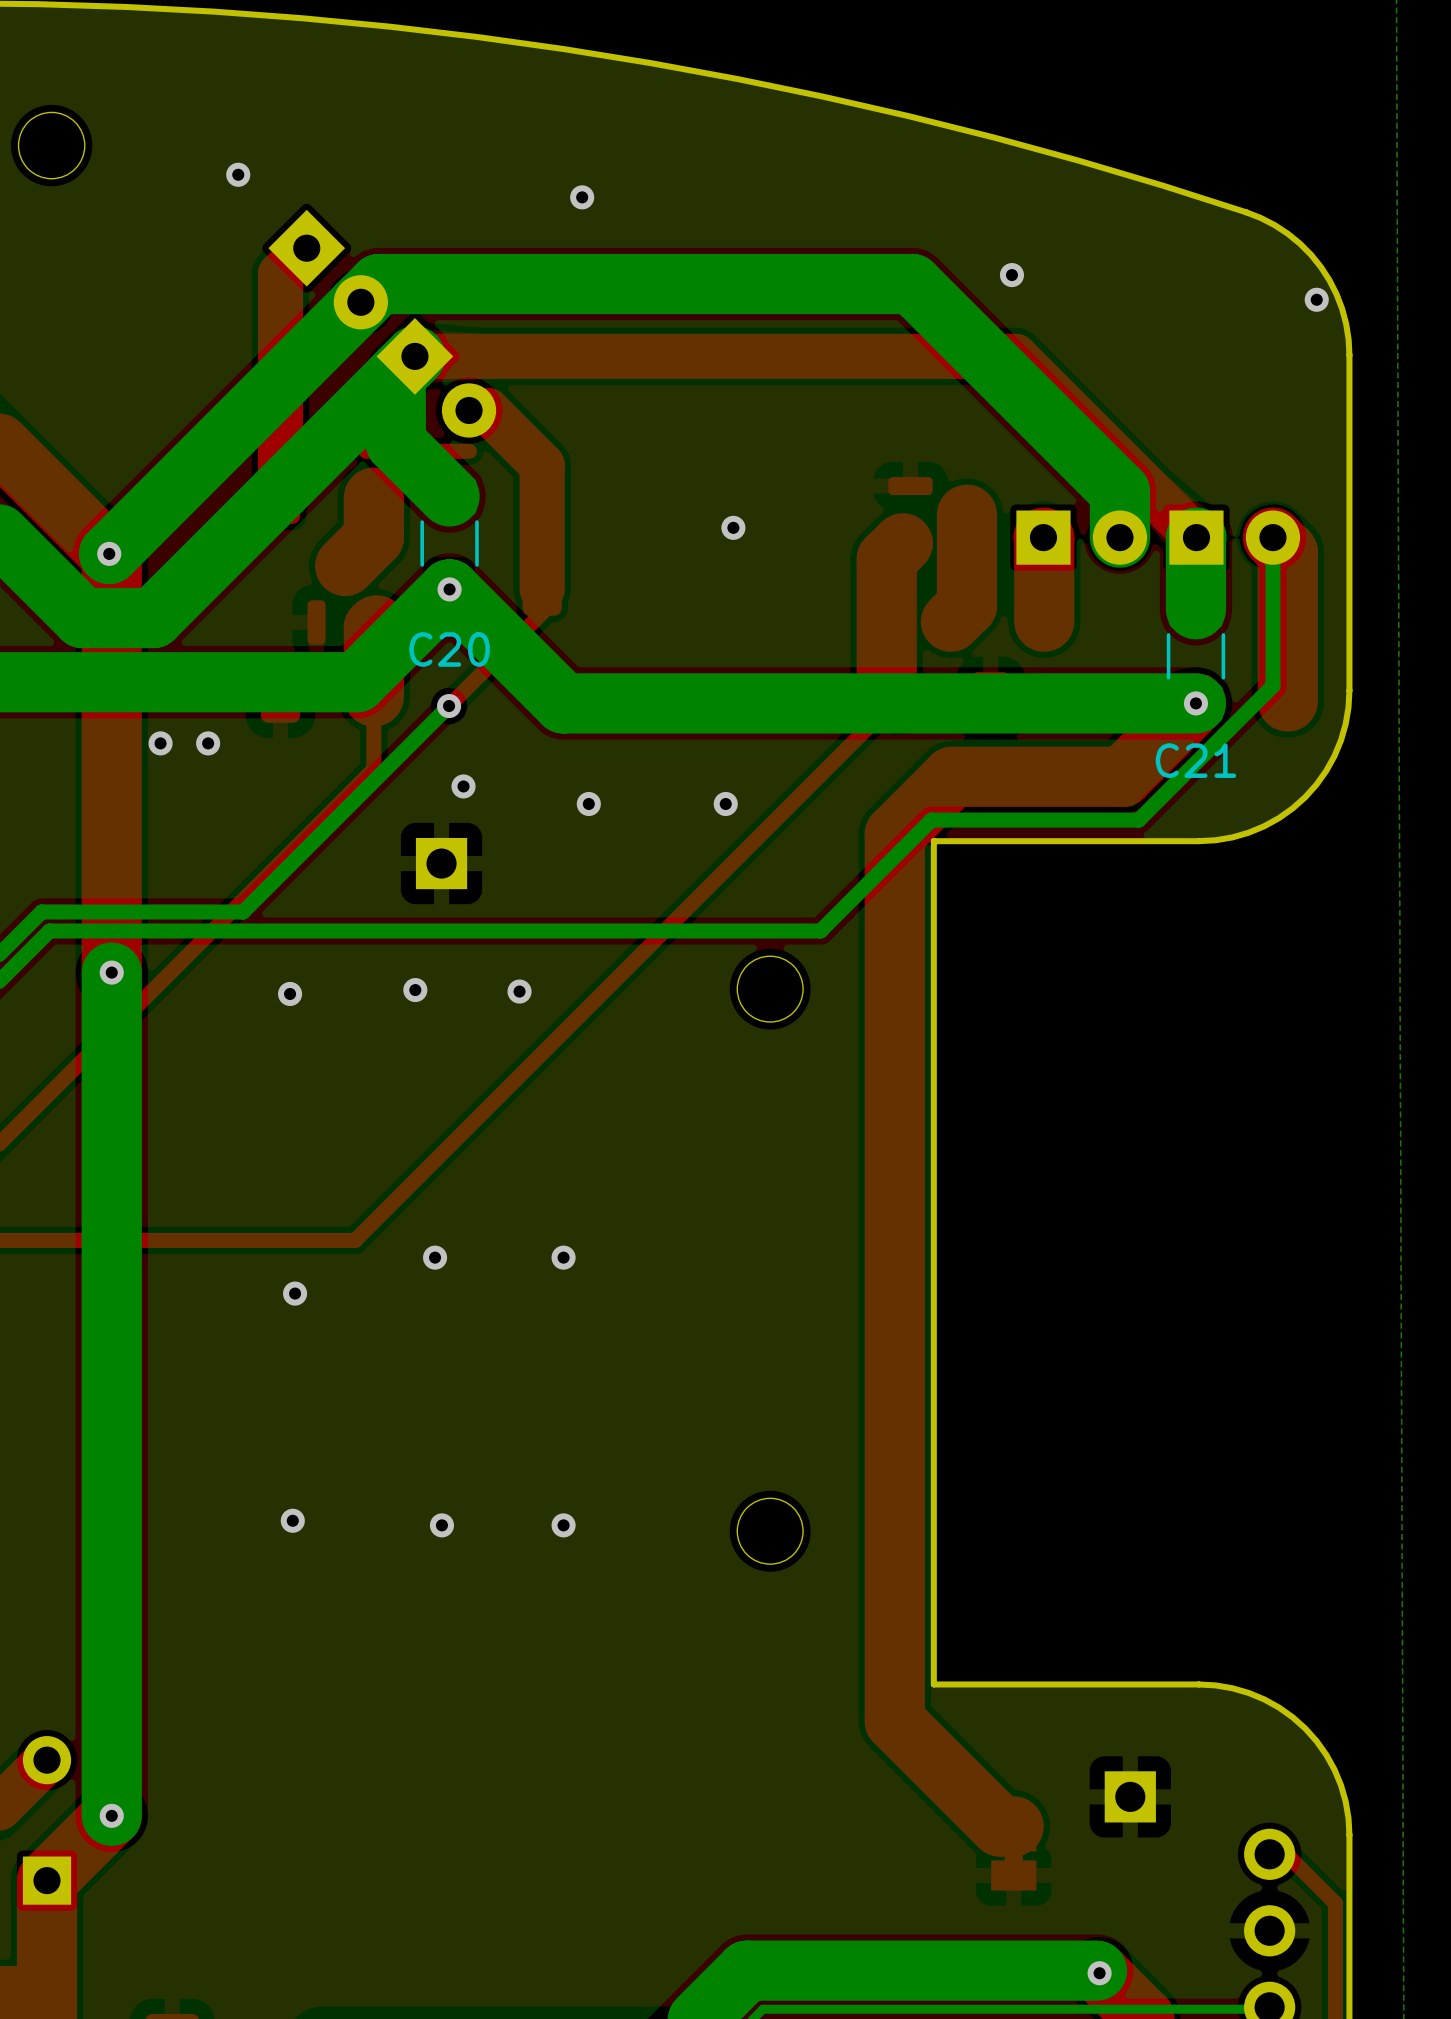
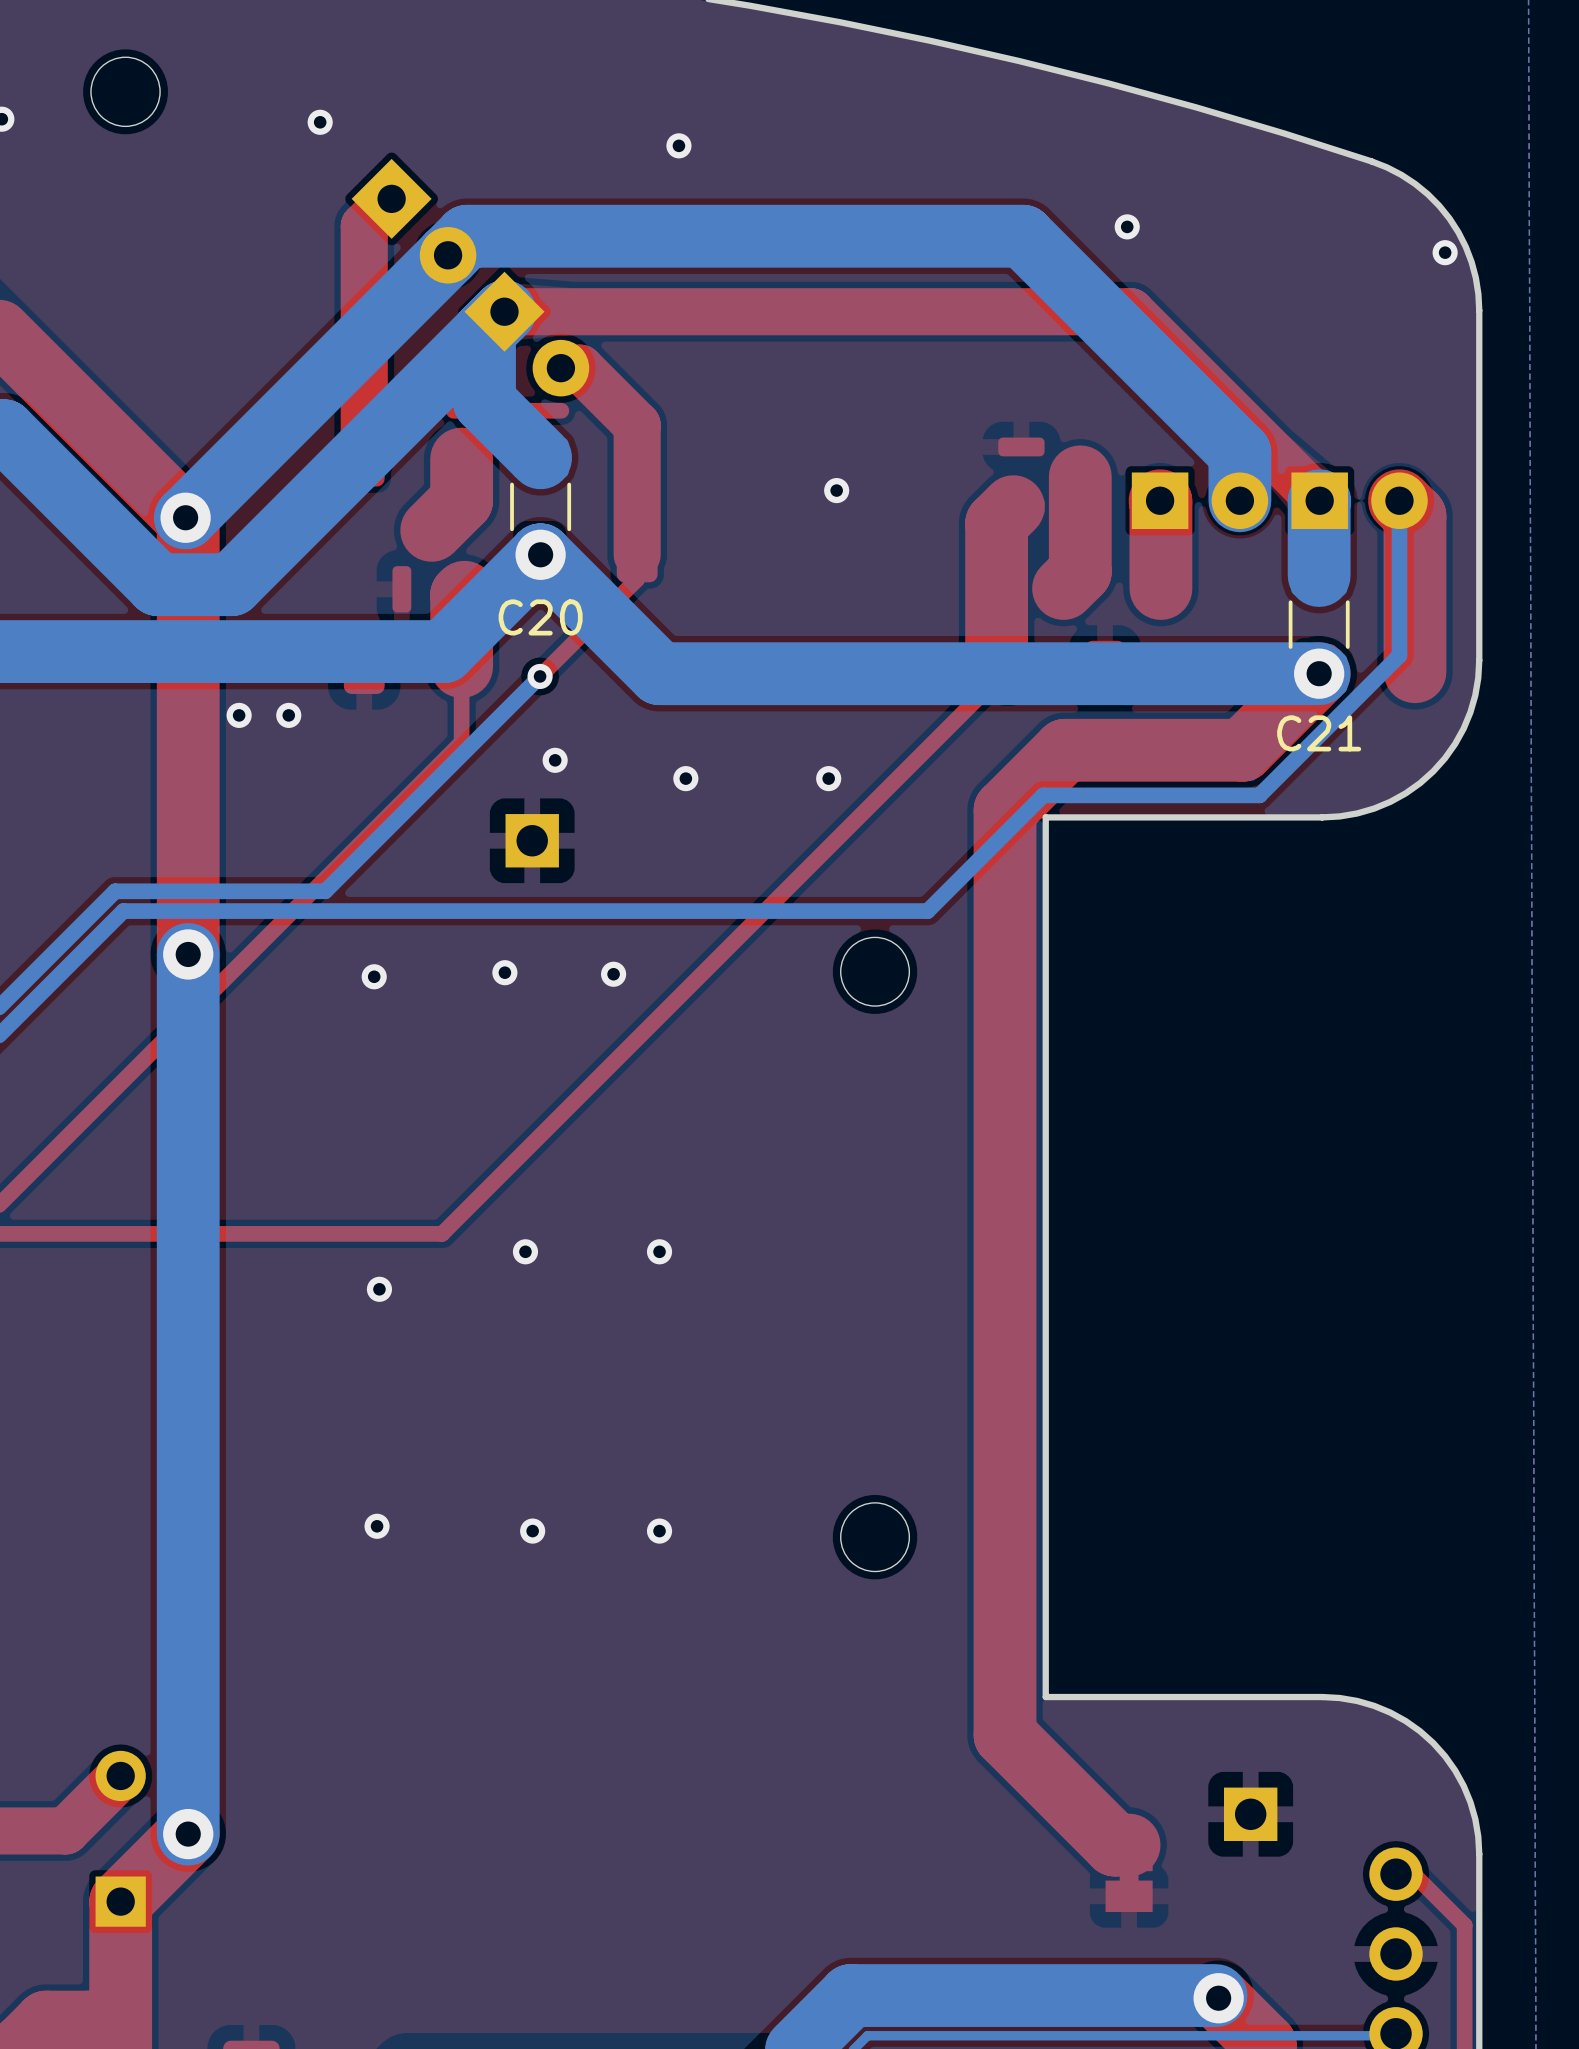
via size: [97, 541, 122, 566] -> [160, 492, 211, 543]
via size: [437, 577, 462, 602] -> [515, 529, 566, 580]
via size: [1183, 691, 1209, 716] -> [1294, 648, 1345, 699]
via size: [99, 960, 124, 985] -> [163, 929, 214, 980]
via size: [99, 1803, 124, 1828] -> [163, 1808, 214, 1860]
via size: [1087, 1961, 1112, 1986] -> [1193, 1973, 1244, 2024]

